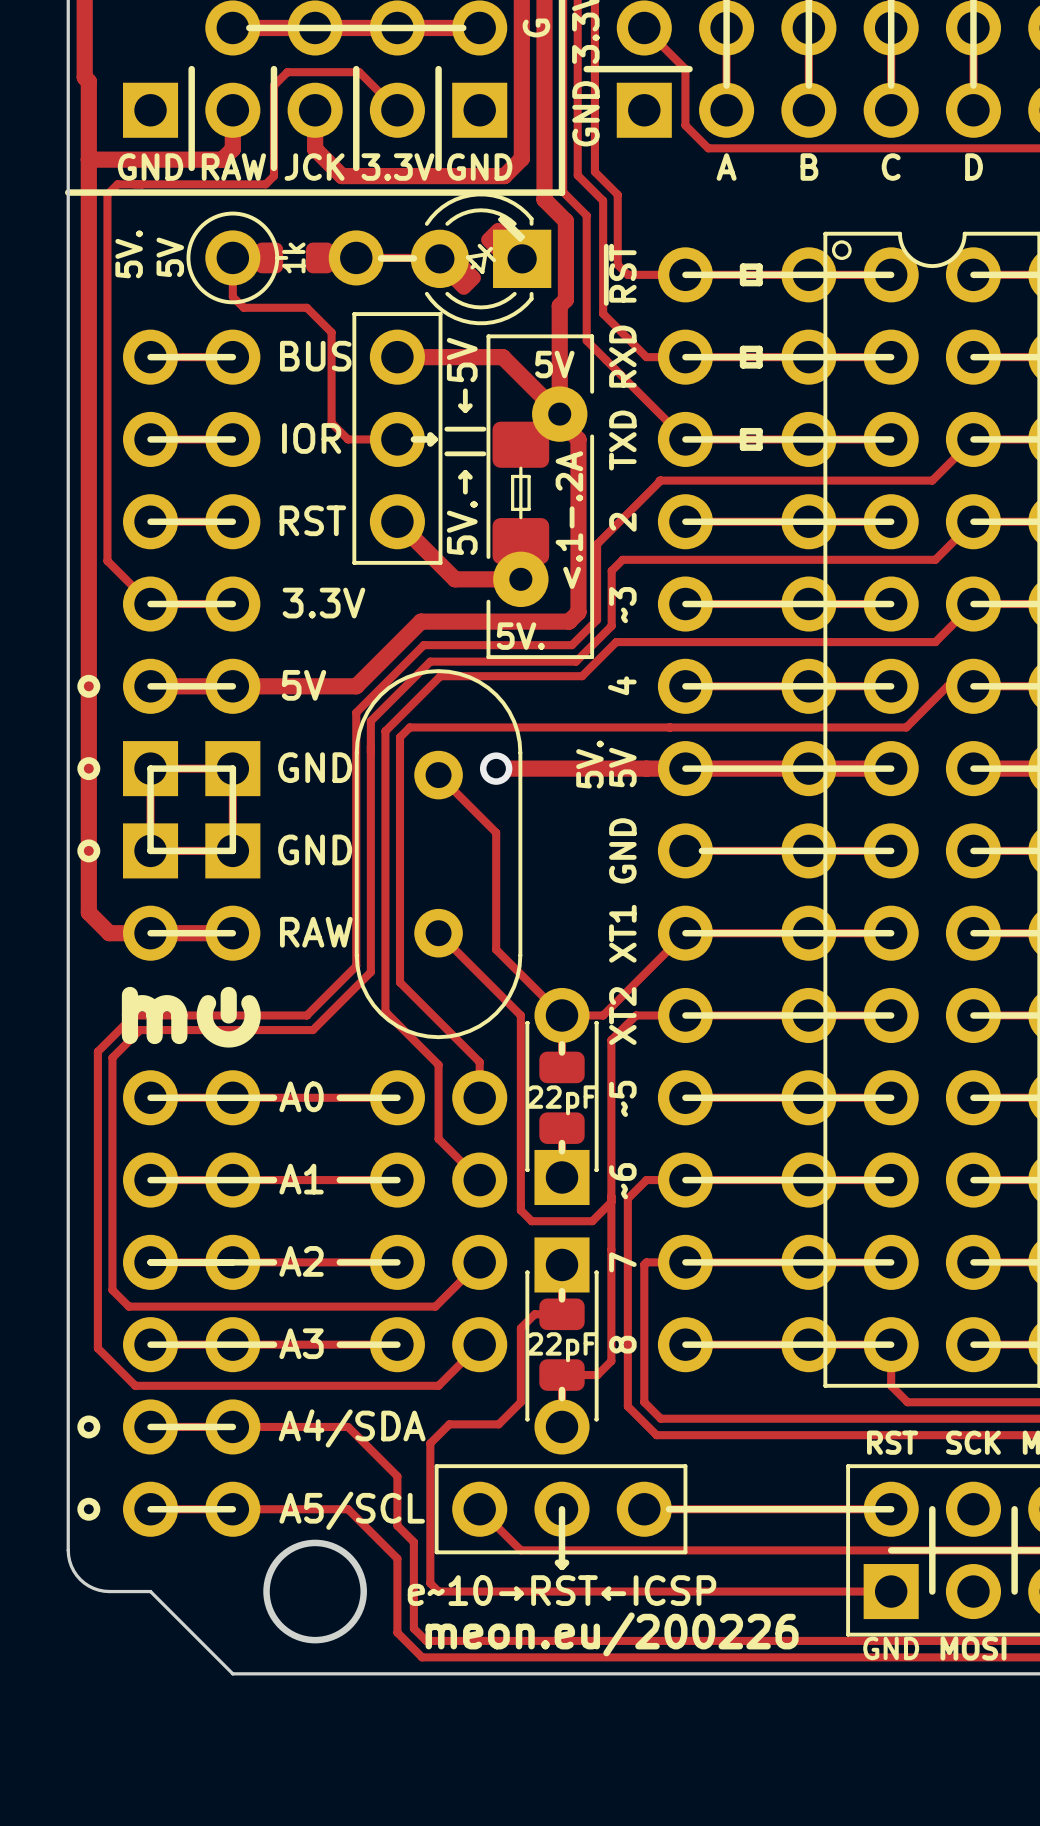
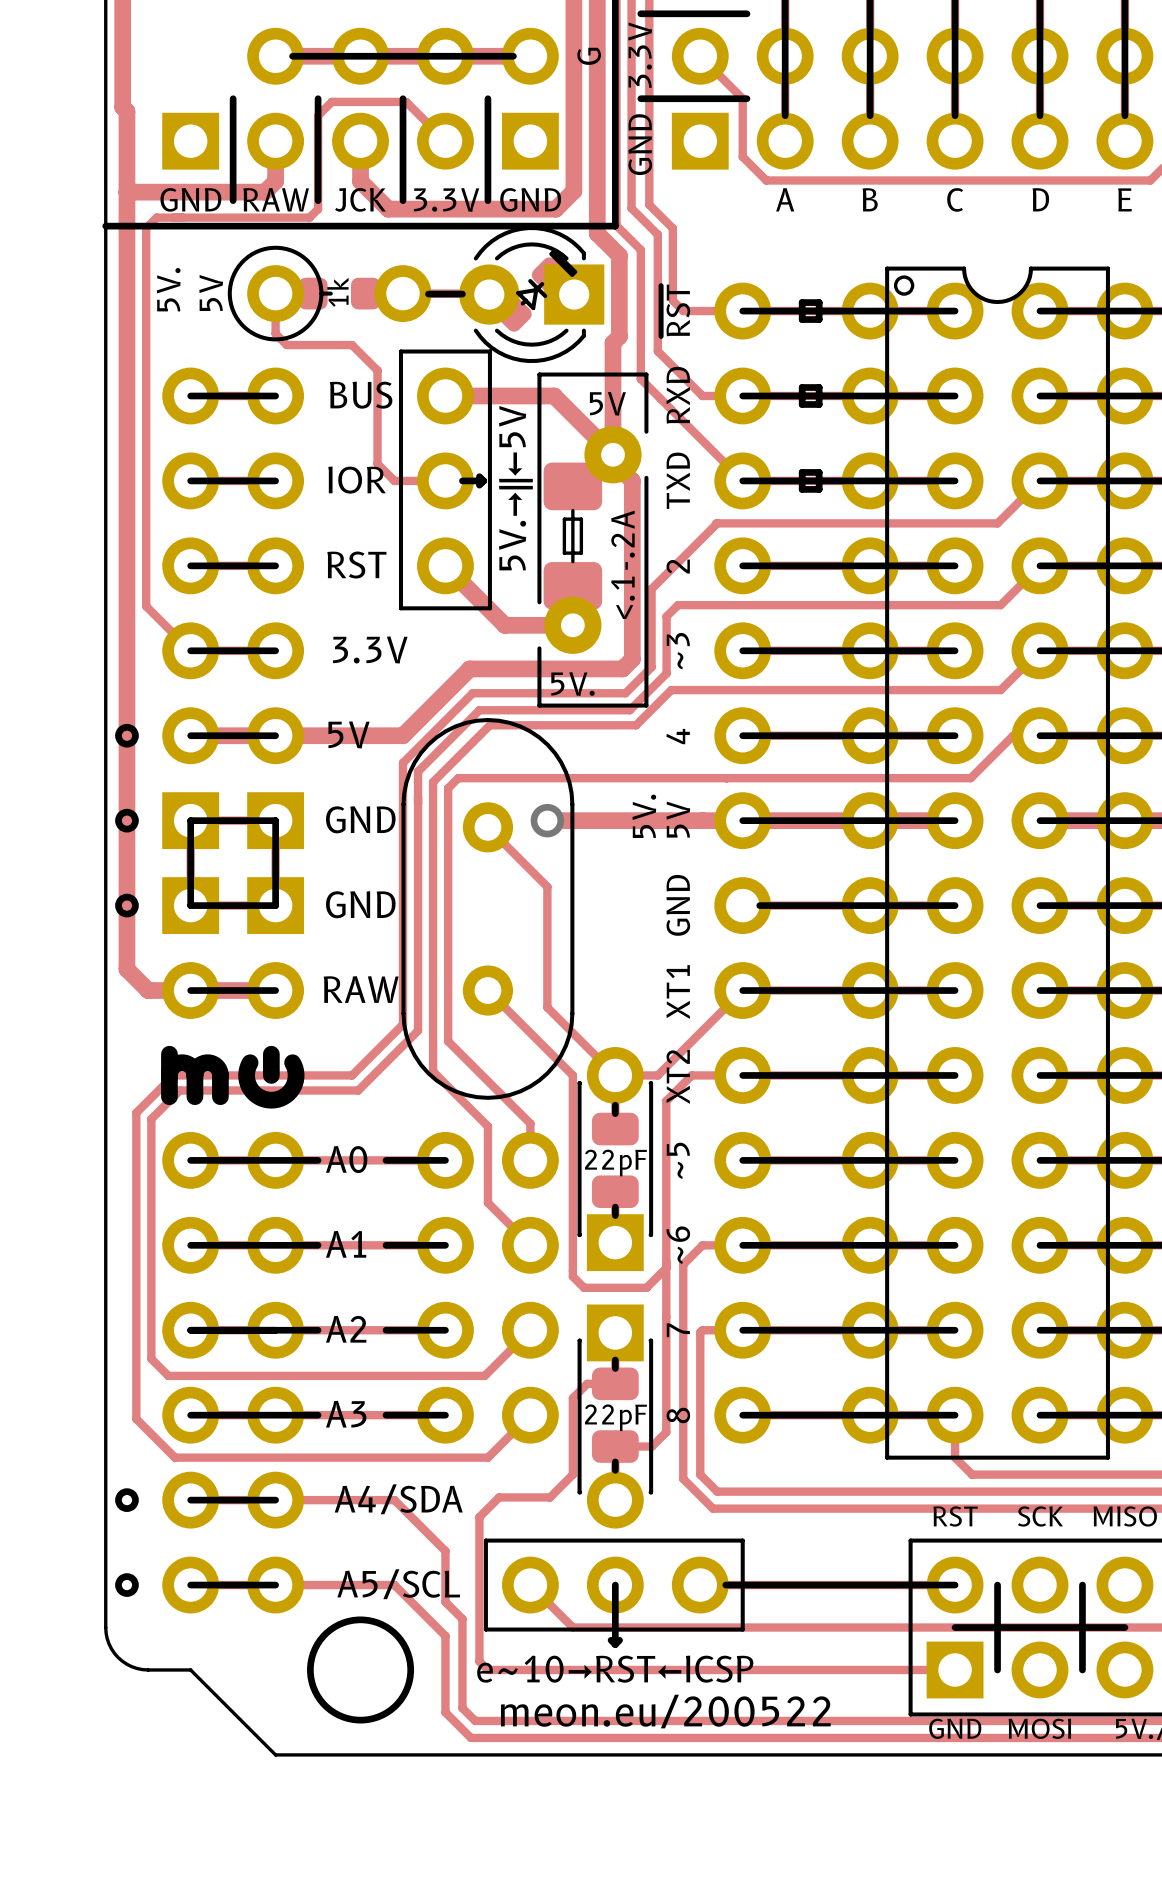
text: meon.eu/200226 (612, 1634) -> meon.eu/200522 (665, 1711)

